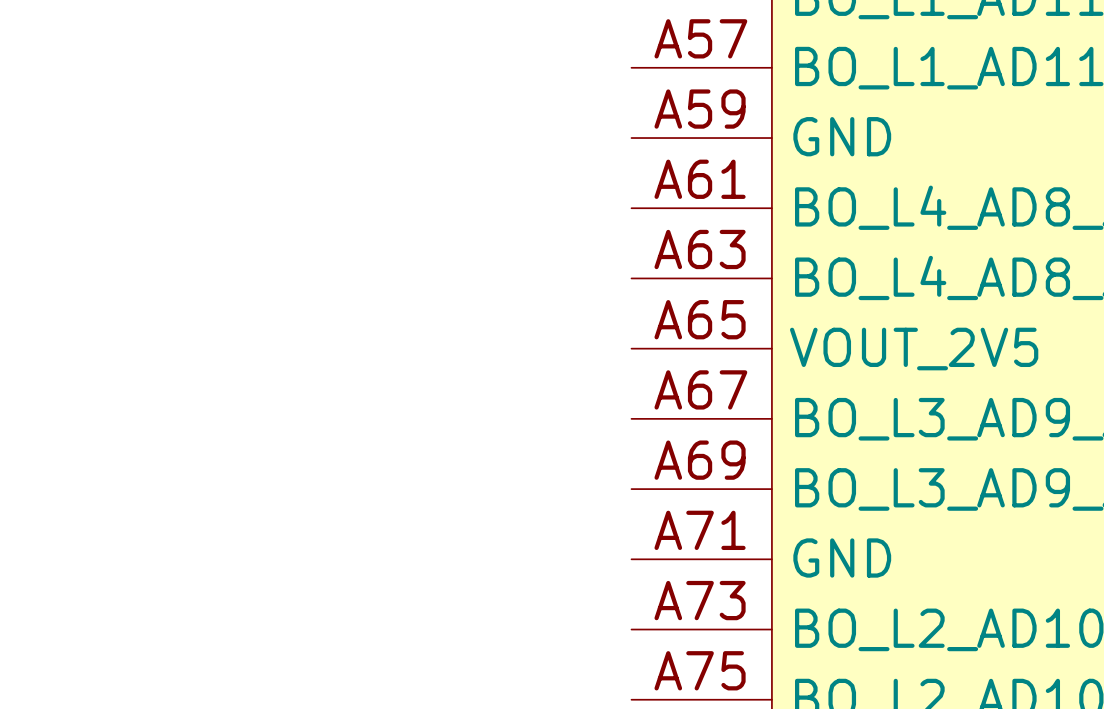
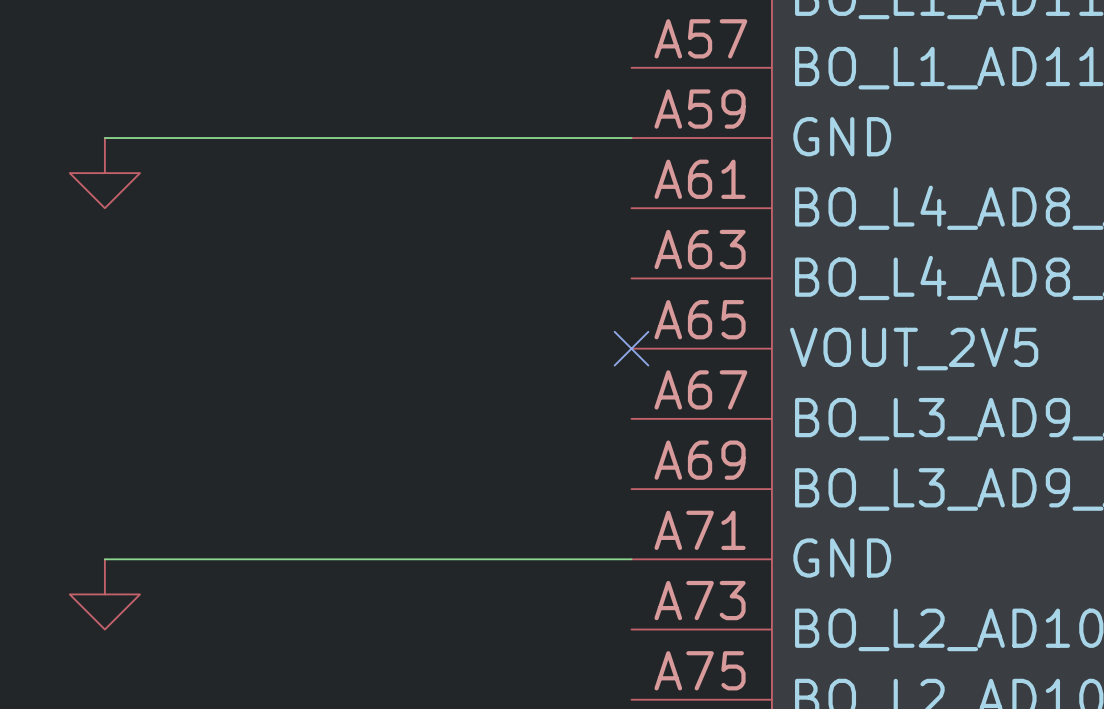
wire: none -> (104, 138) (631, 138)
power symbol: none -> (104, 173)
no-connect mark: none -> (631, 348)
wire: none -> (104, 559) (631, 559)
power symbol: none -> (104, 594)

